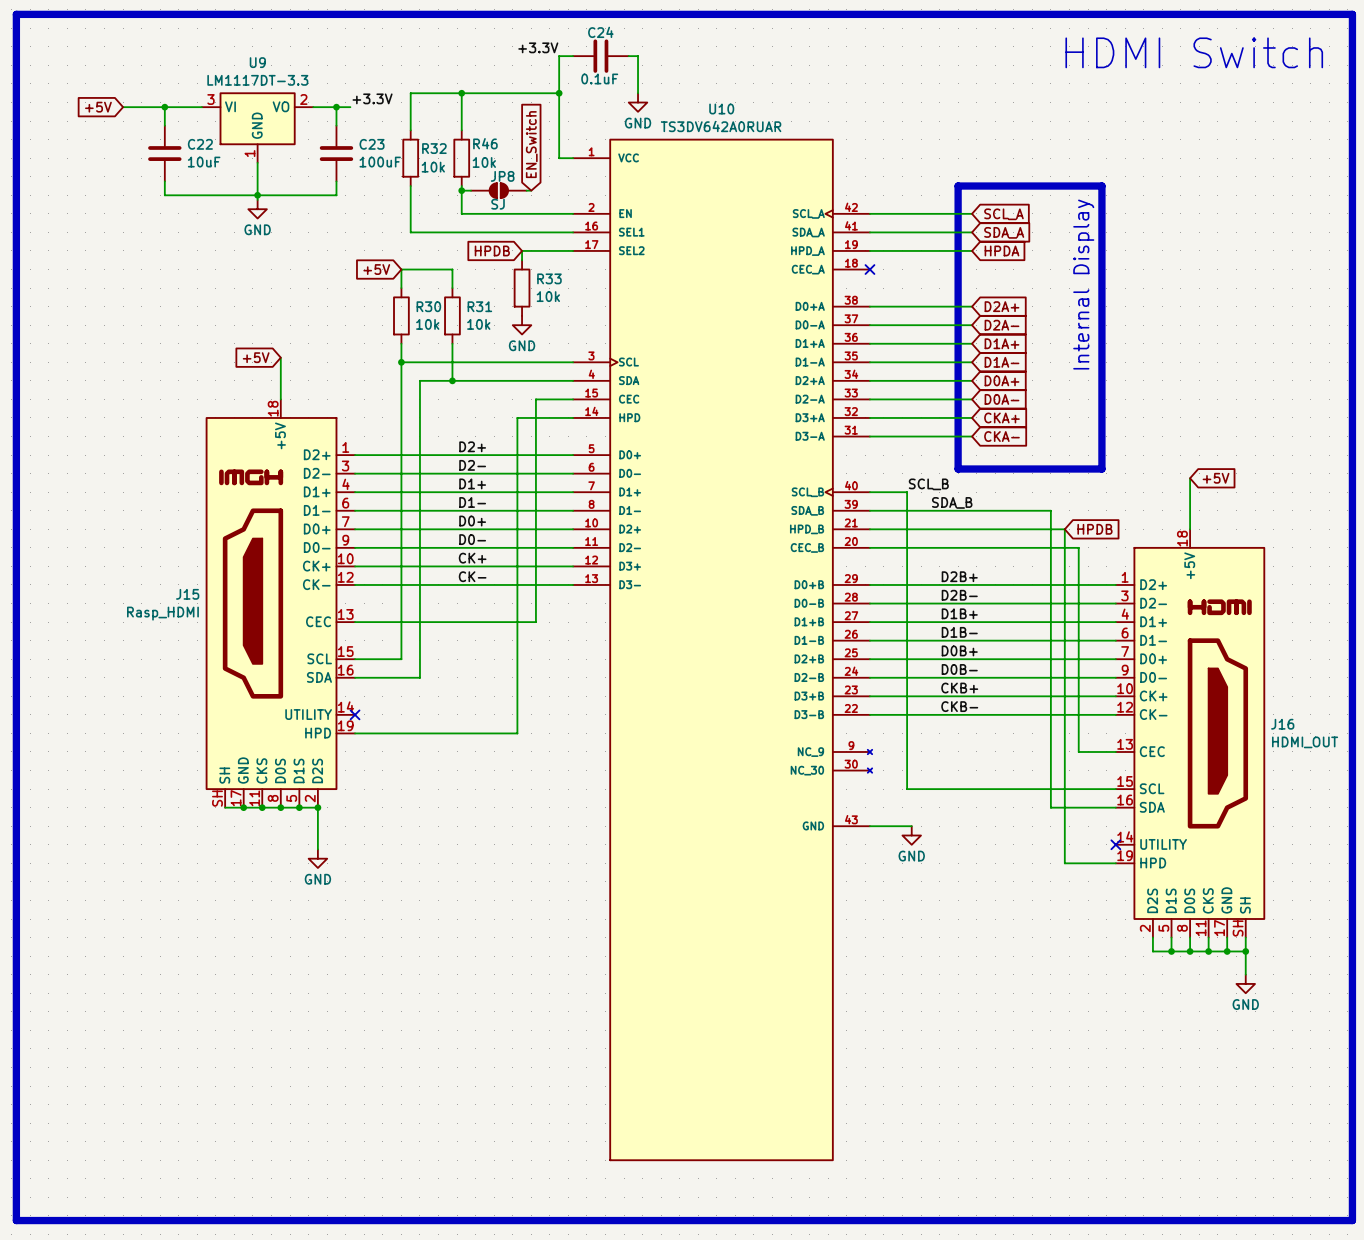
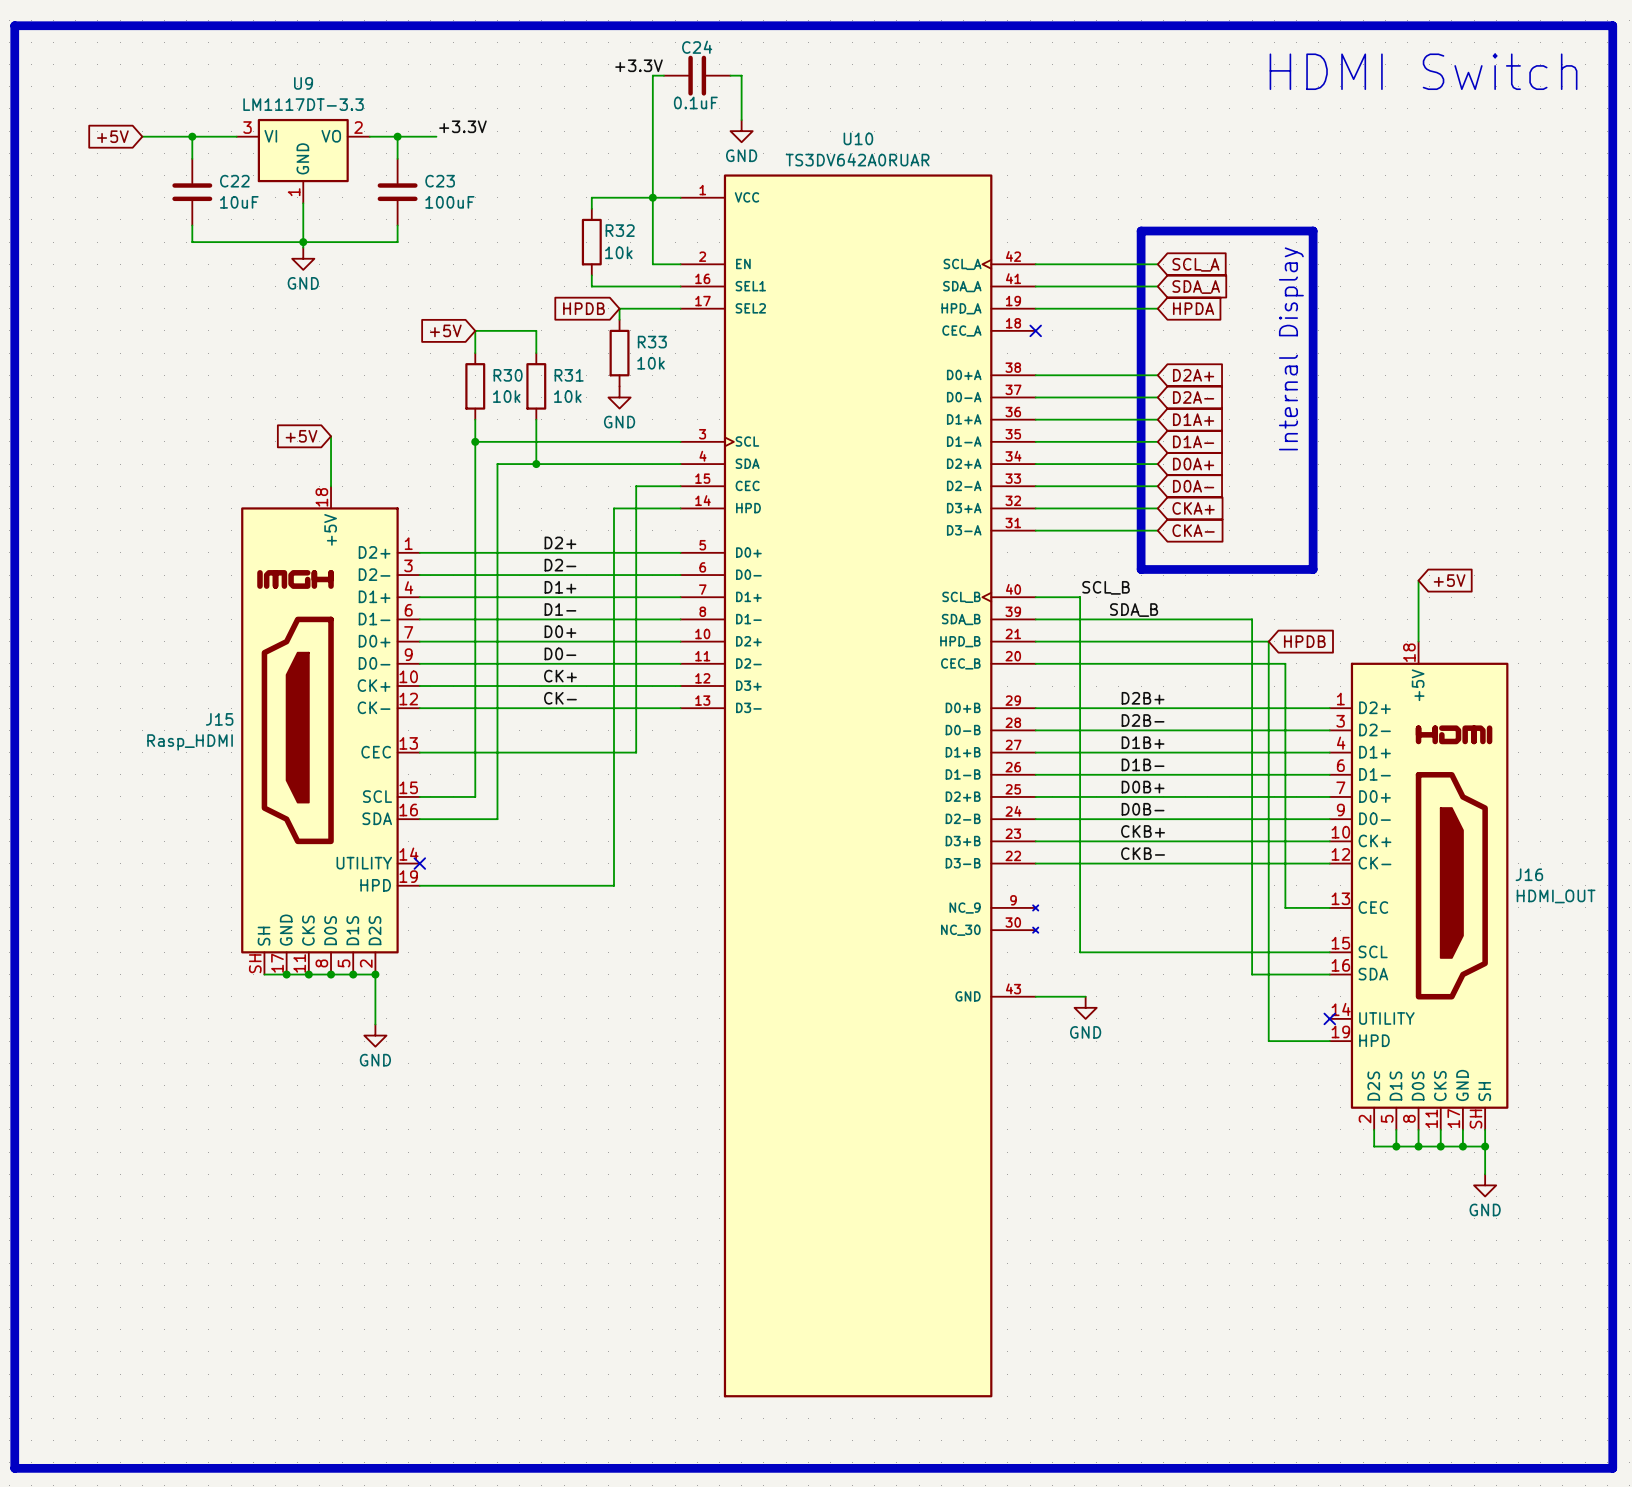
wire: (573, 56) (559, 56) (559, 158) -> (591, 208) (591, 197) (663, 197)
C24 position: (600, 56) -> (697, 75)
wire: (628, 56) (638, 56) (638, 93) -> (730, 75) (741, 75) (741, 120)
wire: (461, 93) (461, 130) -> none
junction: (461, 93) -> none
wire: (559, 93) (410, 93) (410, 130) -> none
junction: (559, 93) -> none
label position: +3.3V (372, 98) -> +3.3V (462, 126)
power symbol position: GND (638, 102) -> GND (741, 131)
wire: none -> (414, 136) (436, 136)
global label: EN_Switch (531, 144) -> none
R32 position: (410, 158) -> (591, 242)
R46: 10k (461, 158) -> none
junction: none -> (652, 197)
wire: (410, 186) (410, 232) (498, 232) -> (591, 275) (591, 286)
wire: (461, 186) (461, 213) (549, 213) -> (663, 75) (652, 75) (652, 264)
wire: (461, 190) (471, 190) -> none
junction: (461, 190) -> none
JP8: SJ (498, 190) -> none

